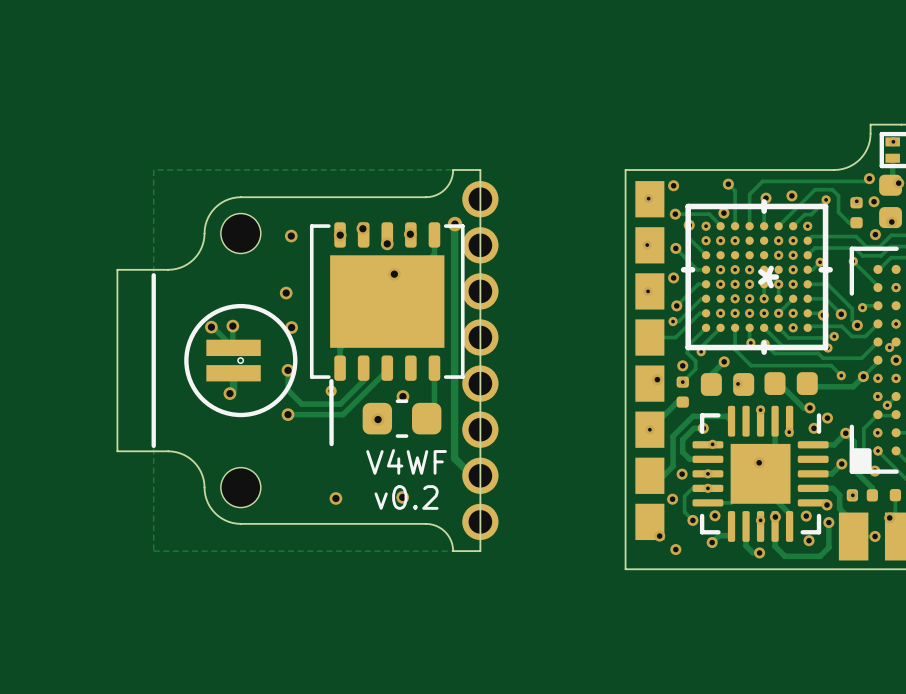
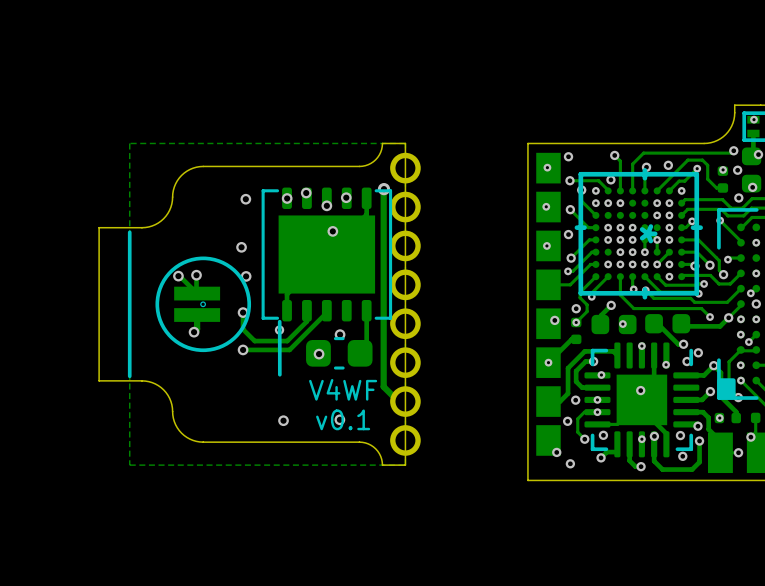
part: (240, 233) -> none
part: (240, 487) -> none
text: v0.2 (406, 497) -> v0.1 (343, 419)

